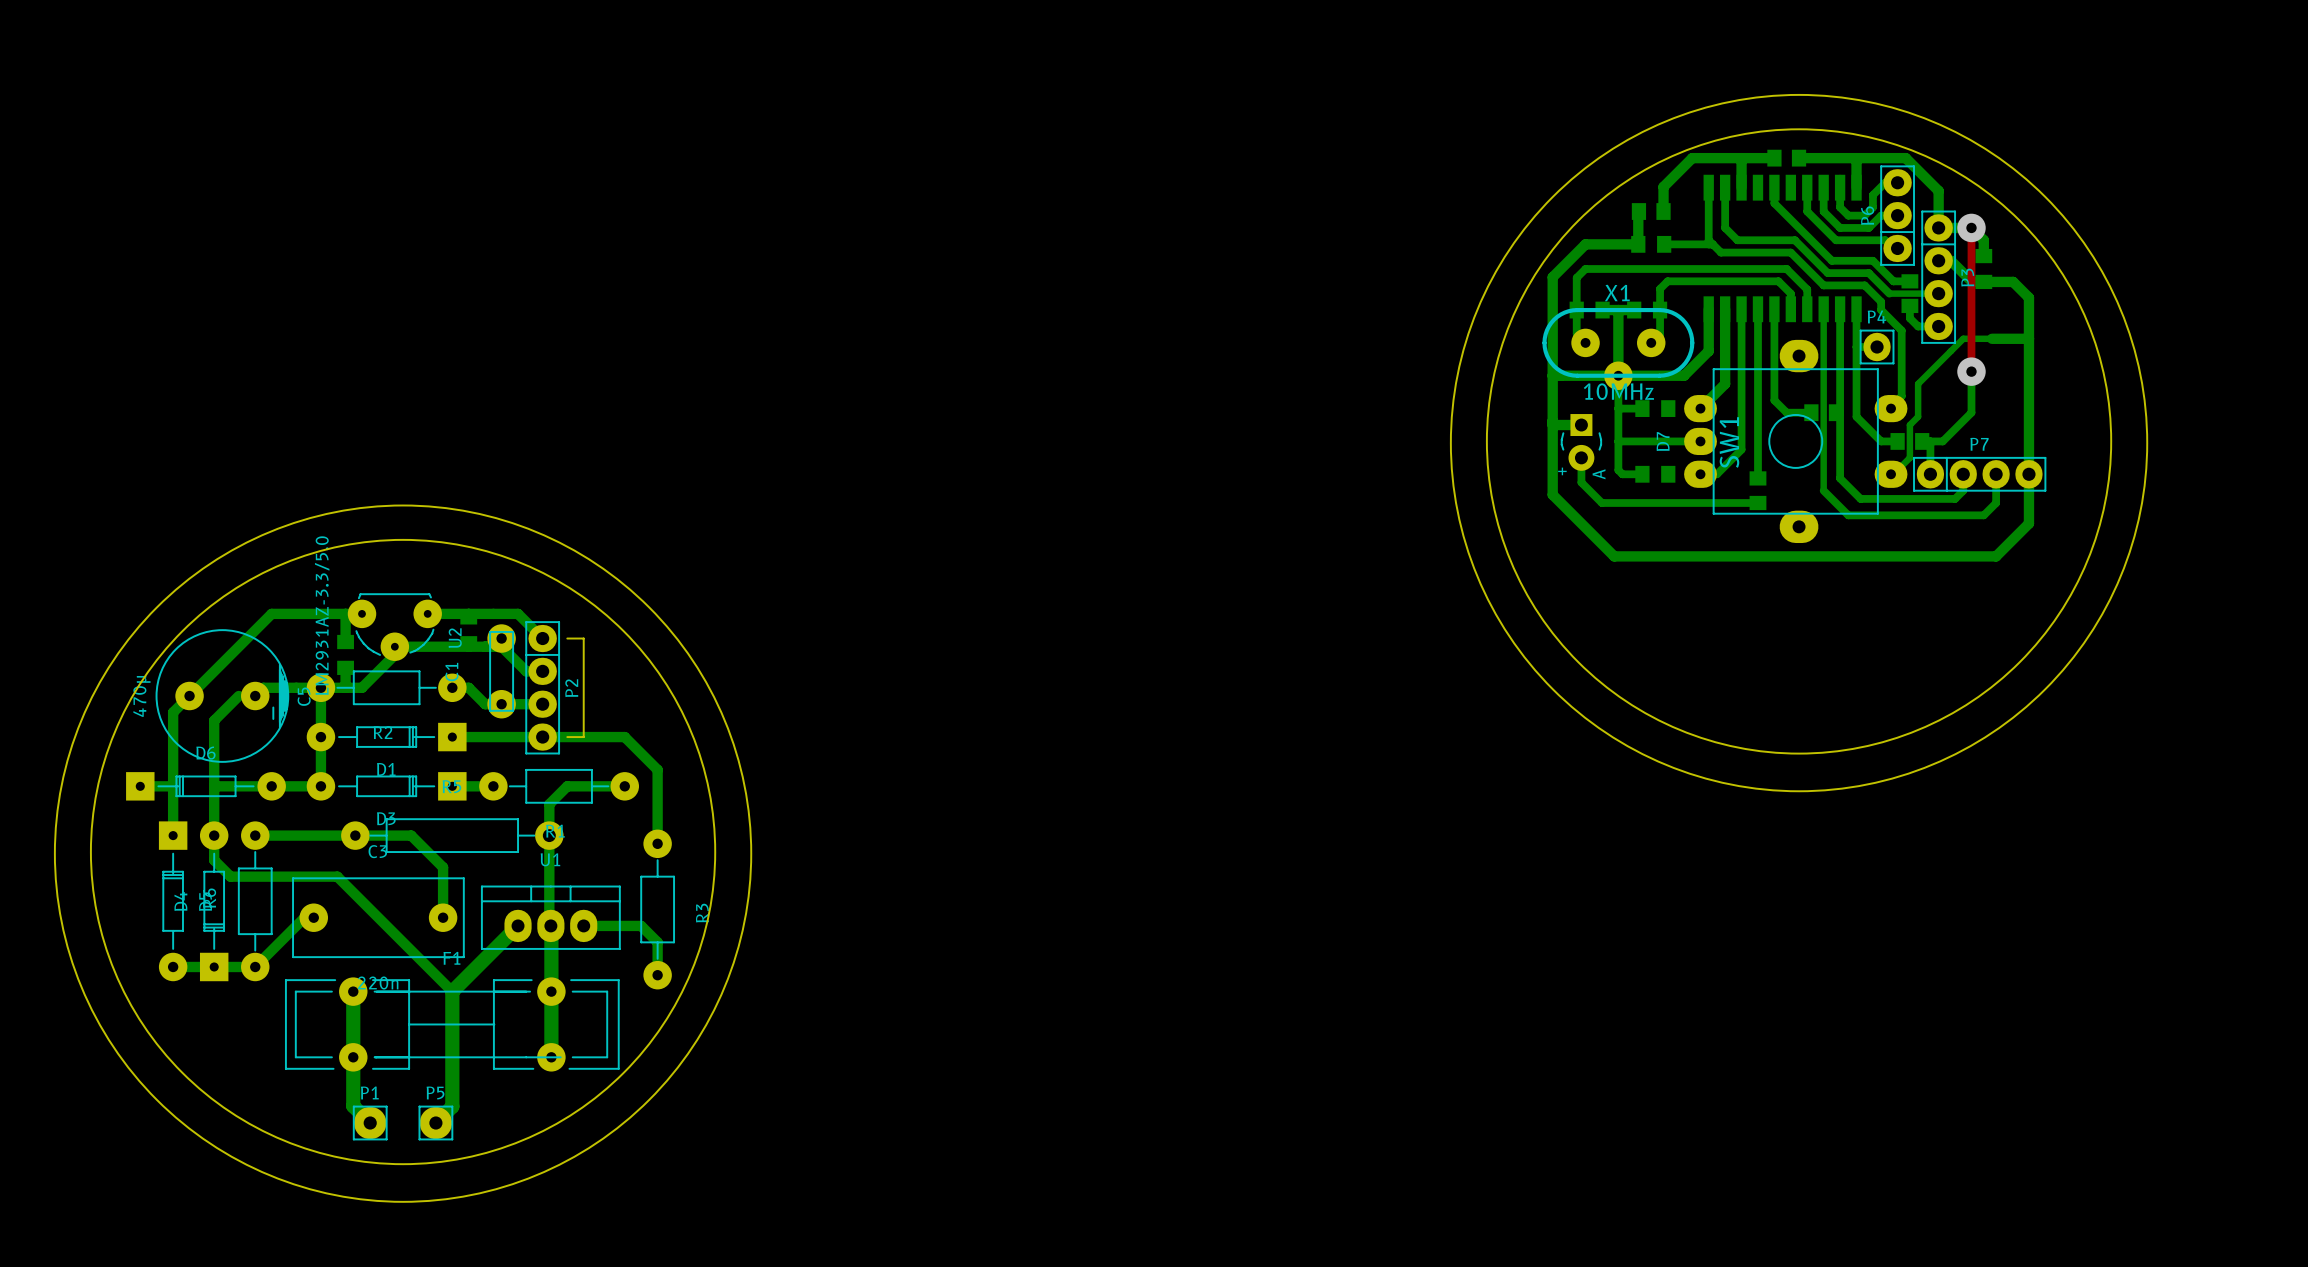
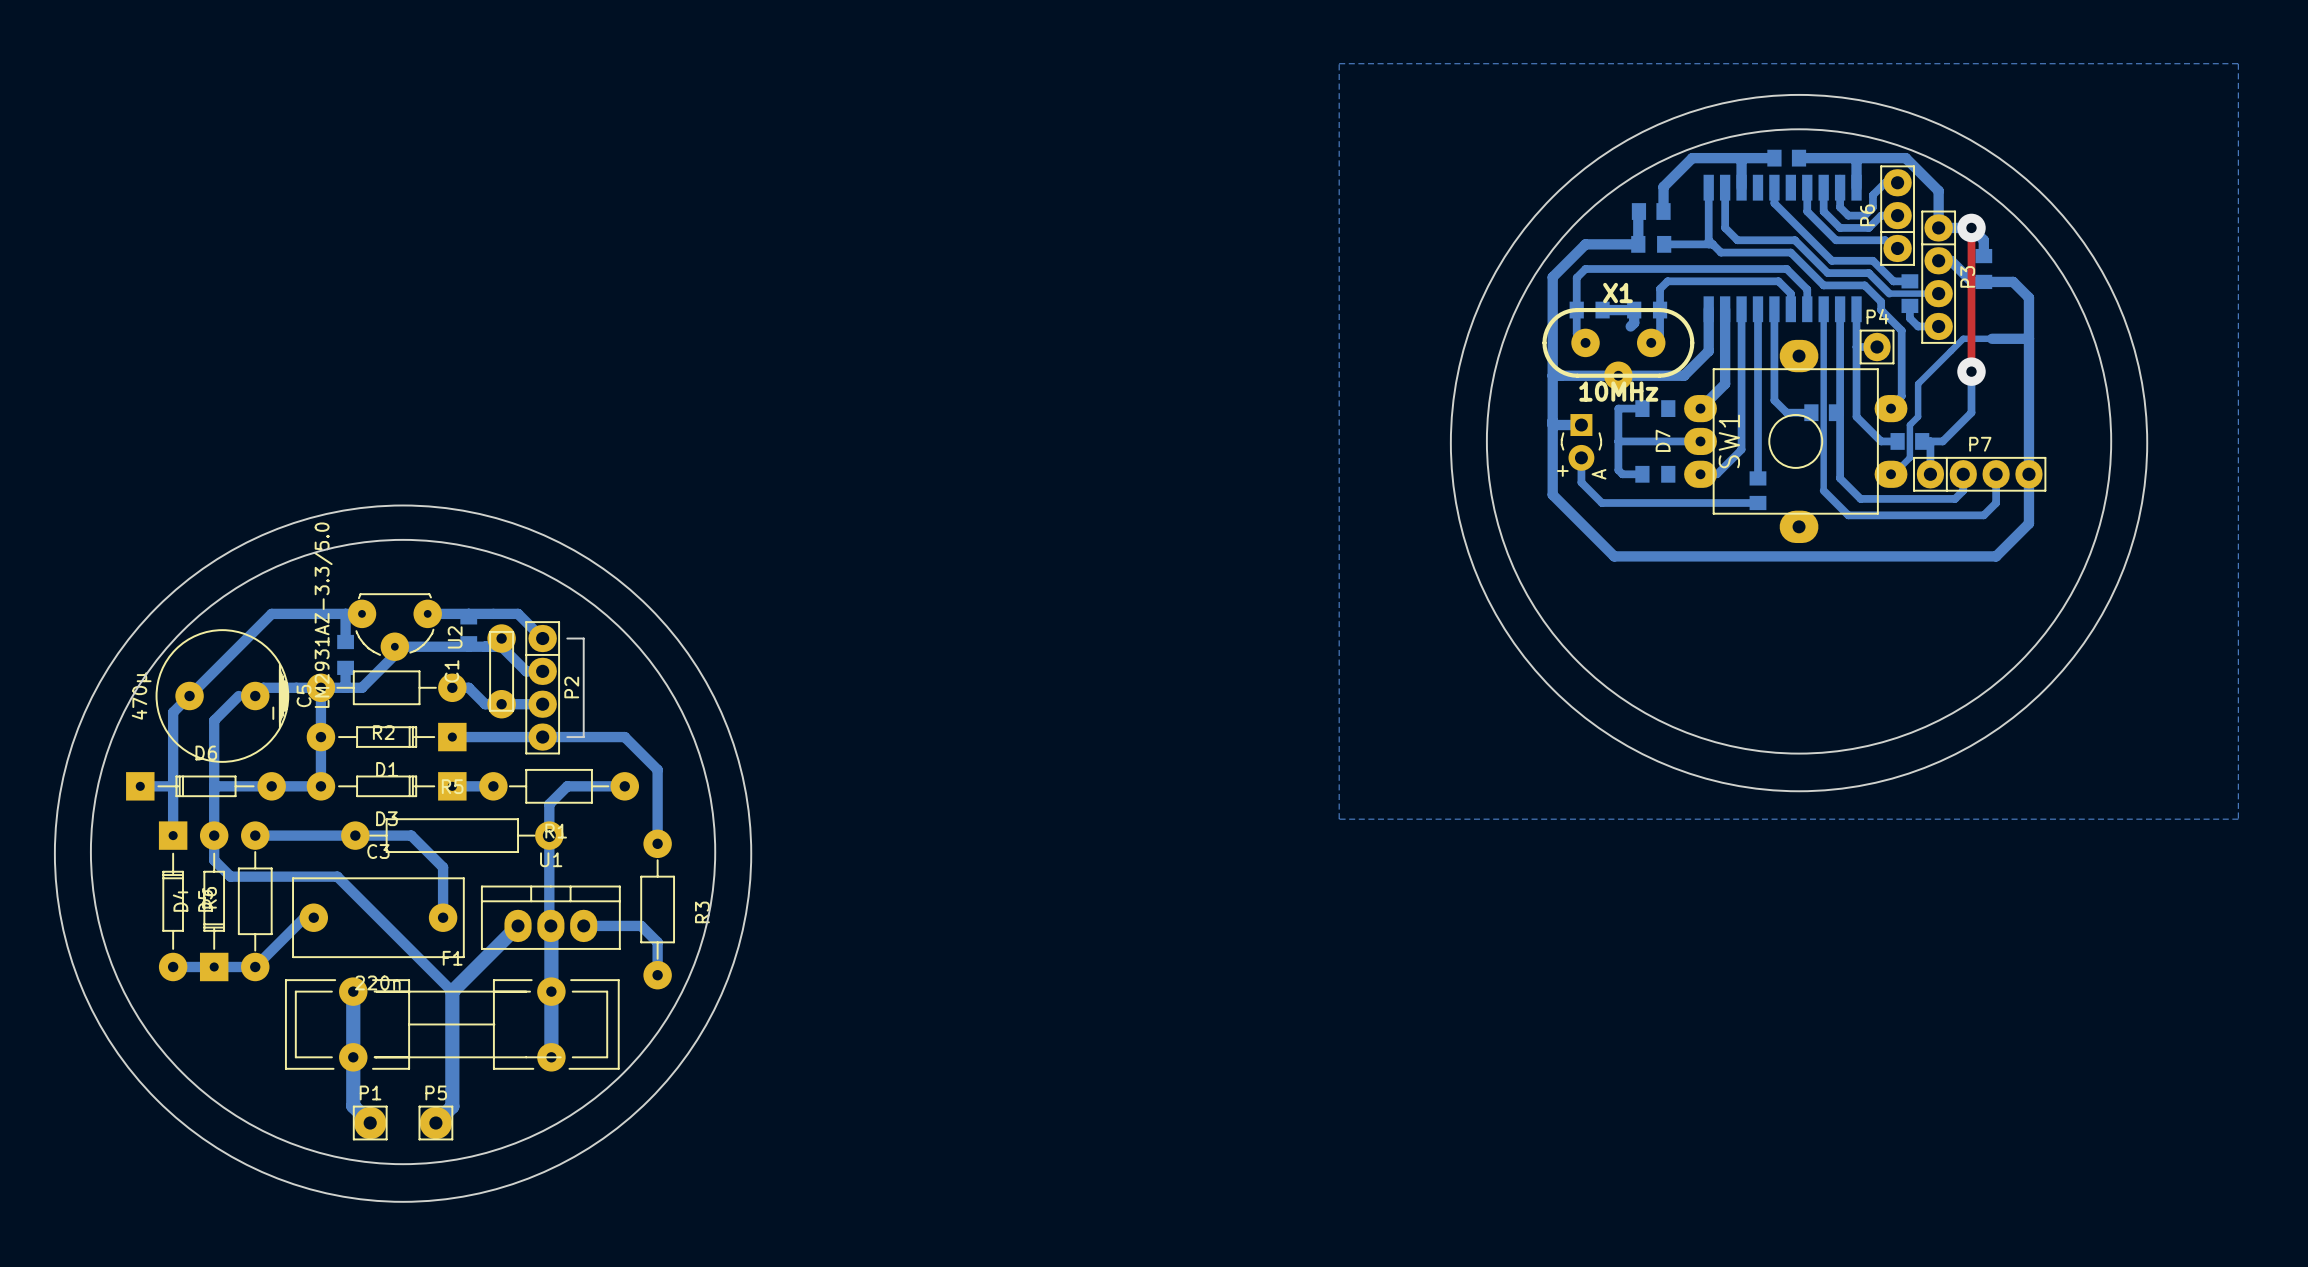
bottom zone outline: none -> (1339, 63) (1339, 819) (2238, 819) (2238, 63) (1339, 63)
bottom track: (1618, 310) (1618, 408) -> none
bottom track: none -> (1634, 310) (1634, 322) (1630, 326)

